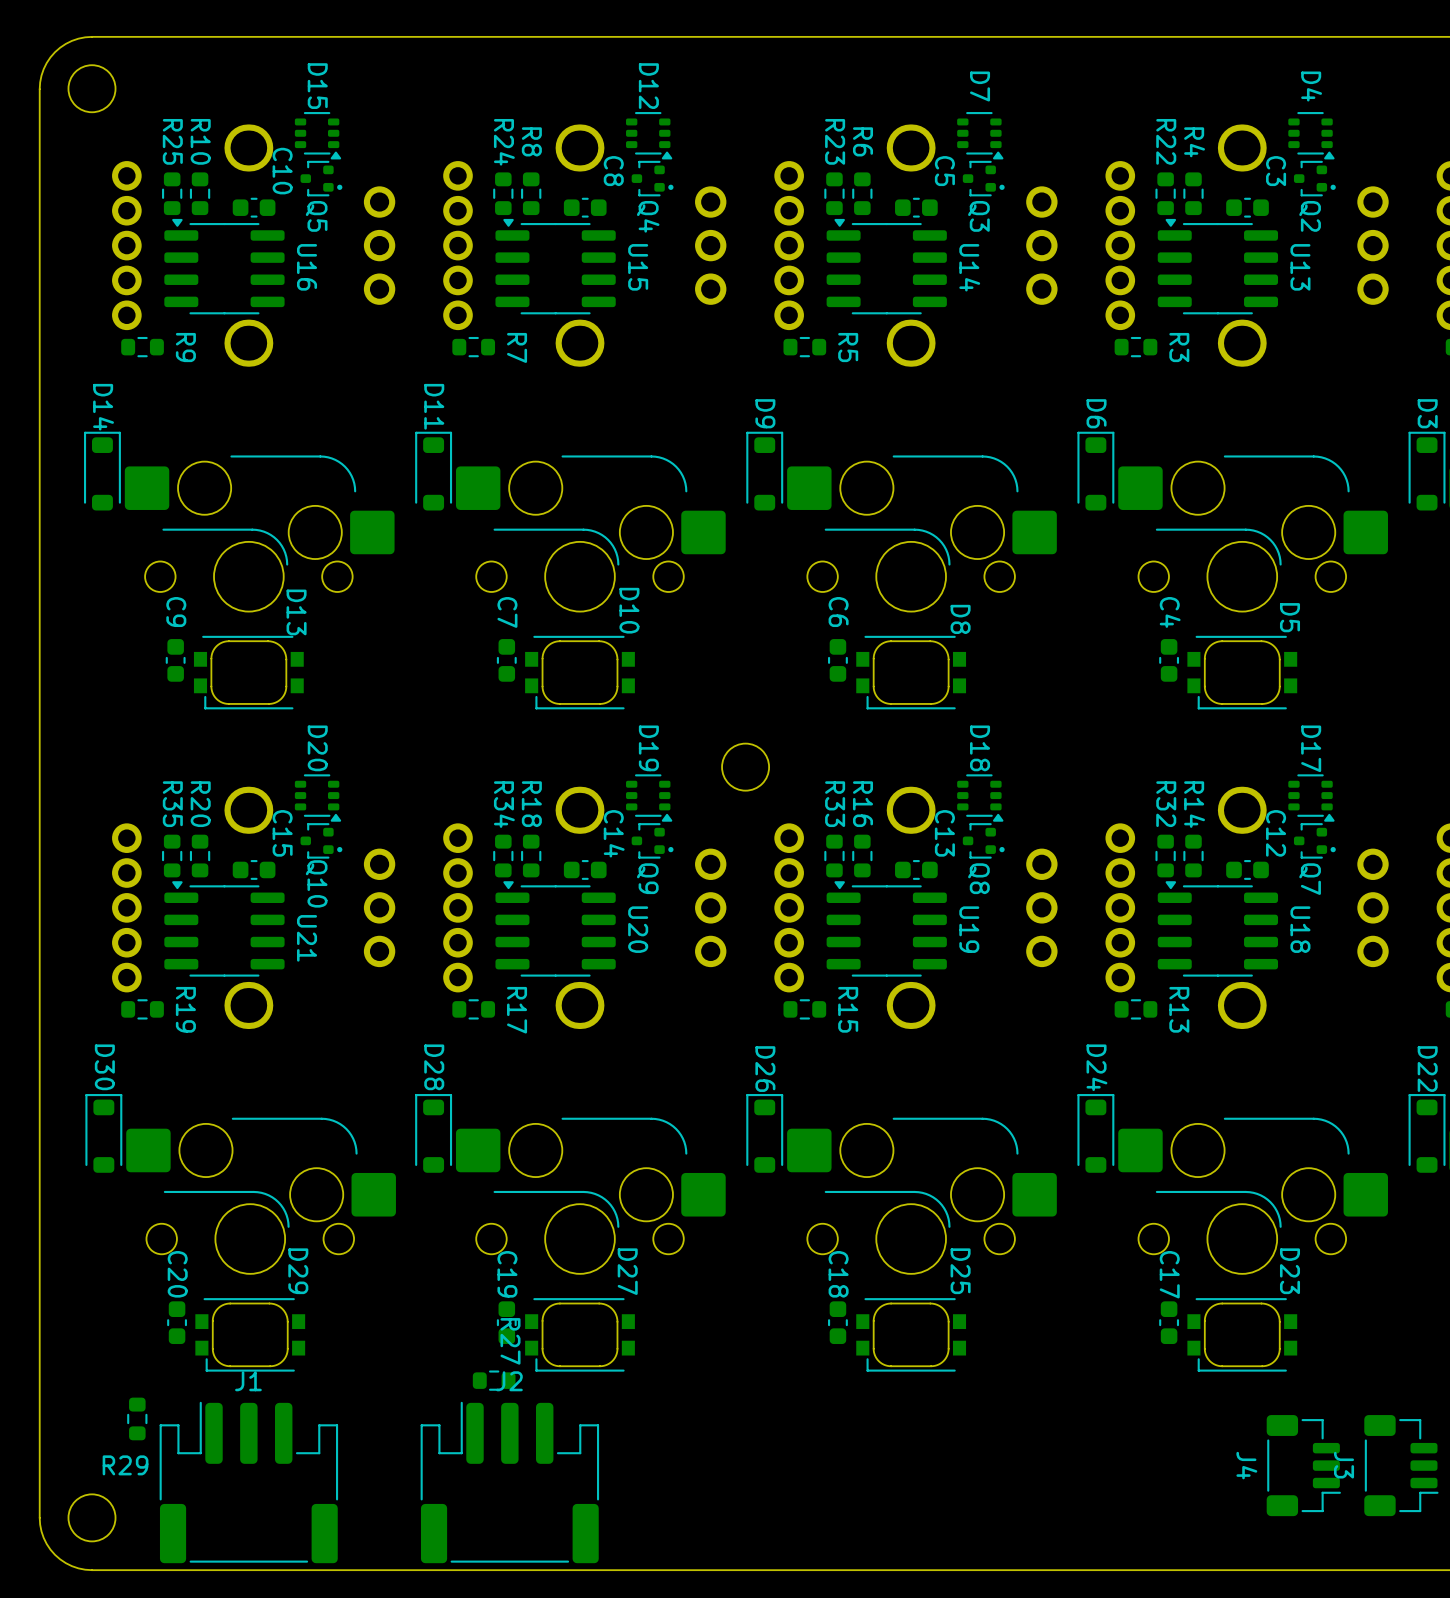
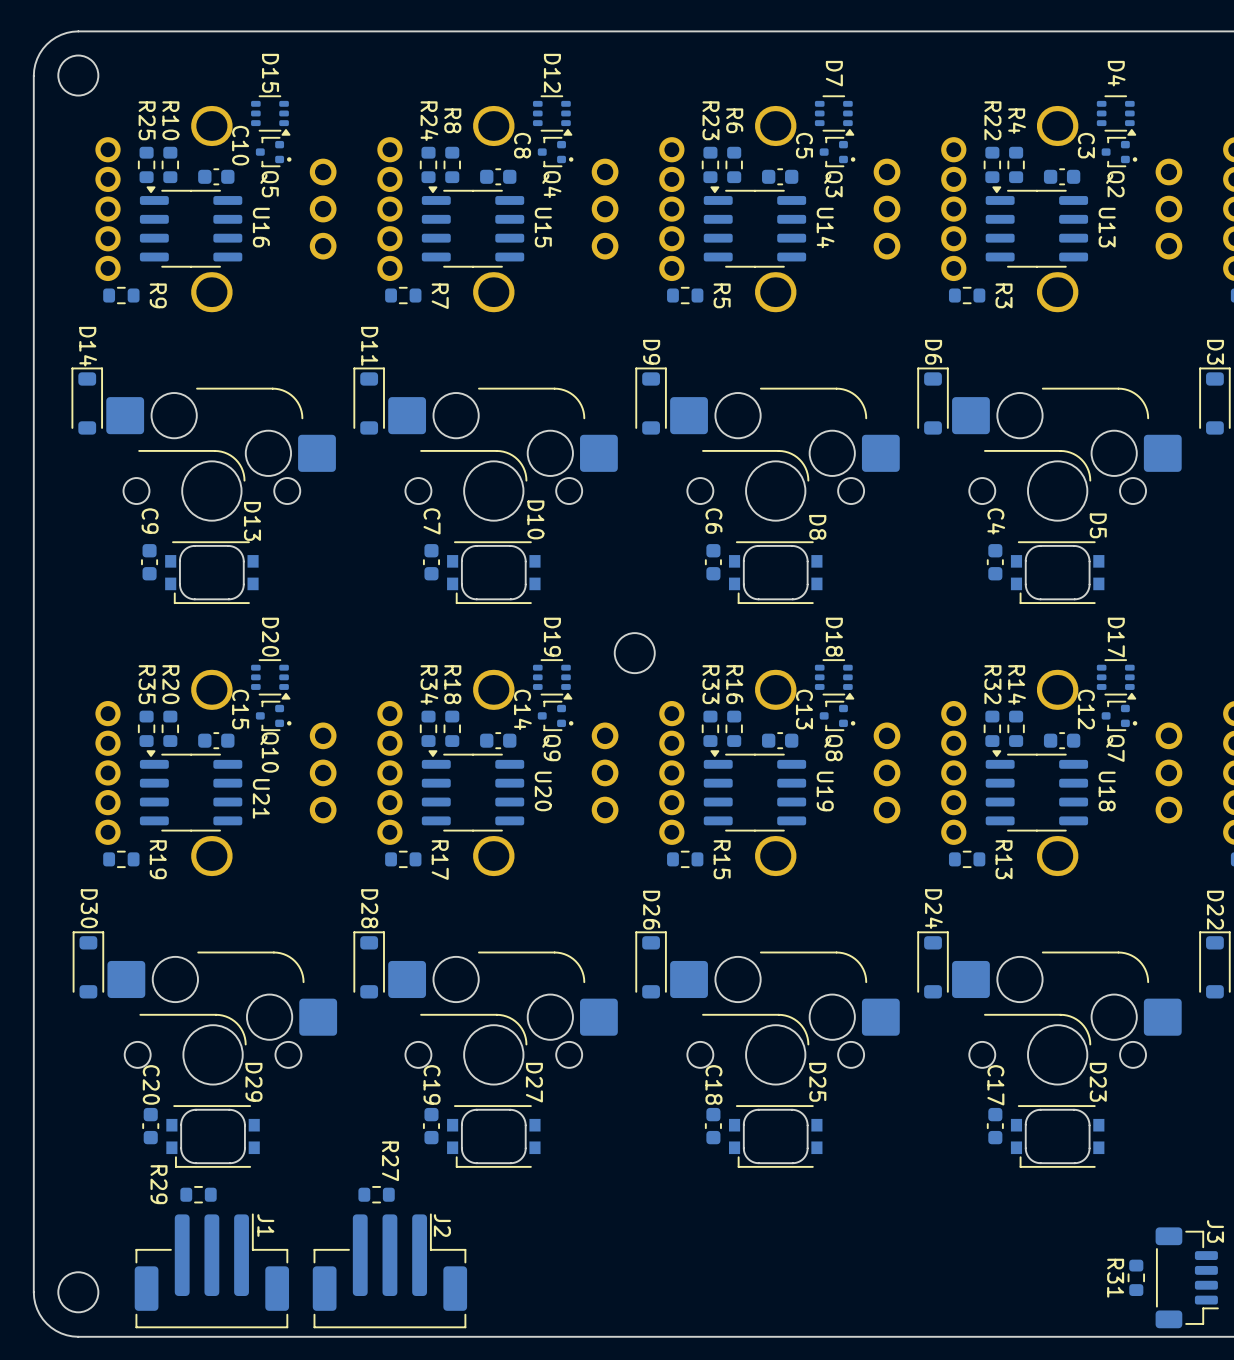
R27 position: (494, 1380) -> (376, 1194)
J1 name position: J1 (248, 1381) -> J1 (265, 1225)
J2 name position: J2 (509, 1381) -> J2 (442, 1225)
J1 footprint: [159, 1401, 339, 1564] -> [134, 1213, 290, 1329]
J2 footprint: [420, 1401, 600, 1564] -> [312, 1213, 468, 1329]
J3 footprint: [1364, 1415, 1439, 1517] -> [1155, 1227, 1219, 1329]
R29 rotation: 0° (137, 1418) -> 90° clockwise (198, 1194)
R29 position: (137, 1418) -> (198, 1194)
J4: (1303, 1465) -> none
J3 name position: J3 (1344, 1465) -> J3 (1215, 1231)
R31: none -> (1136, 1277)

